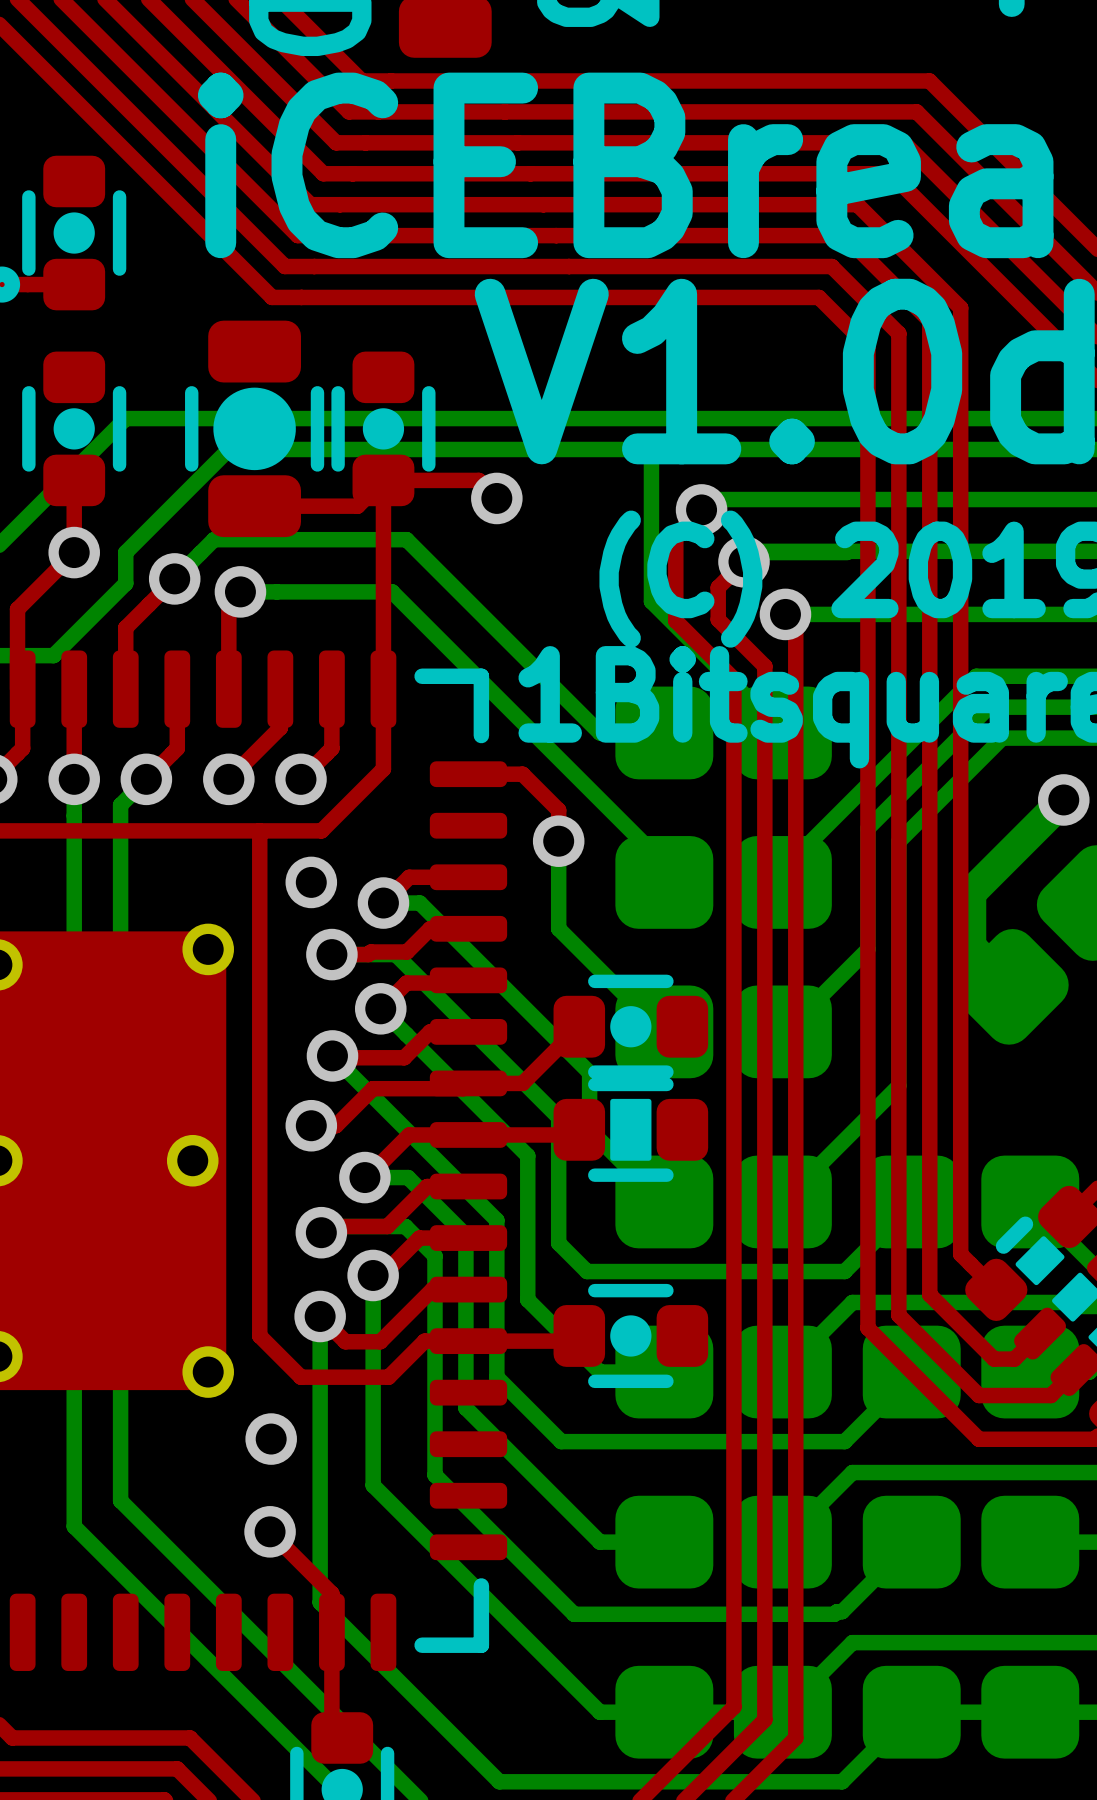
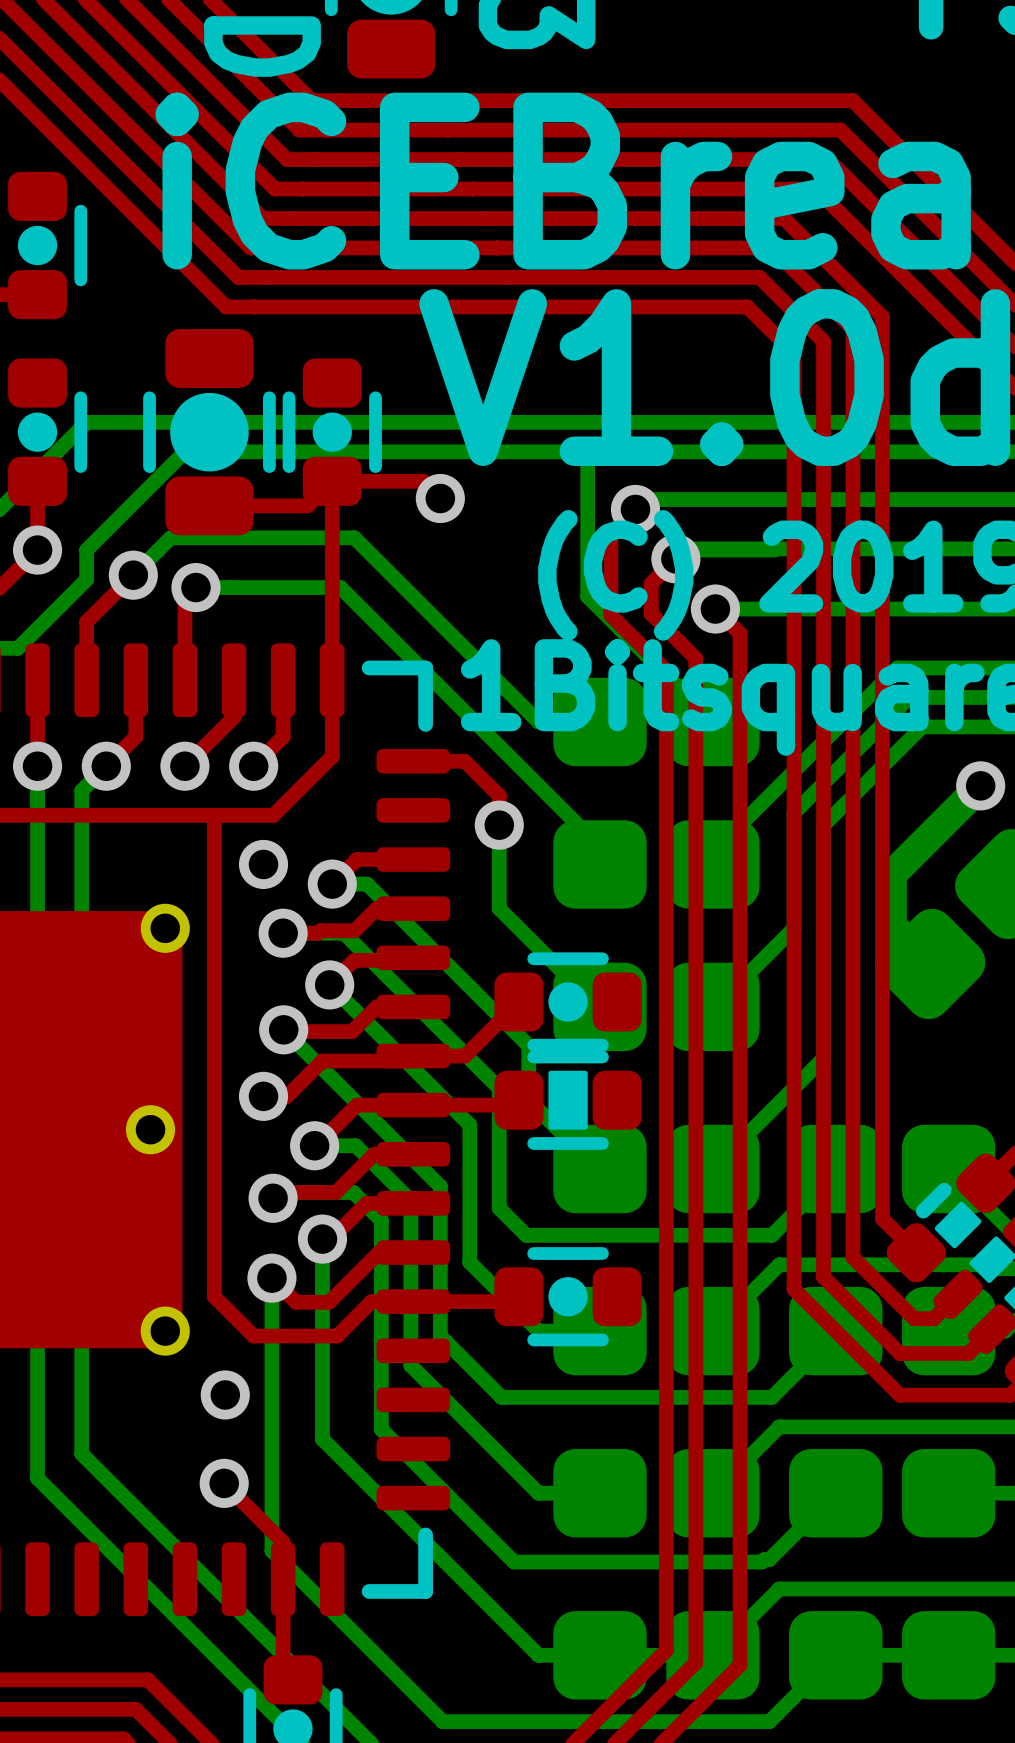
top track: (795, 624) (795, 1737) -> (725, 618) (739, 633) (739, 1665) (725, 1679)

